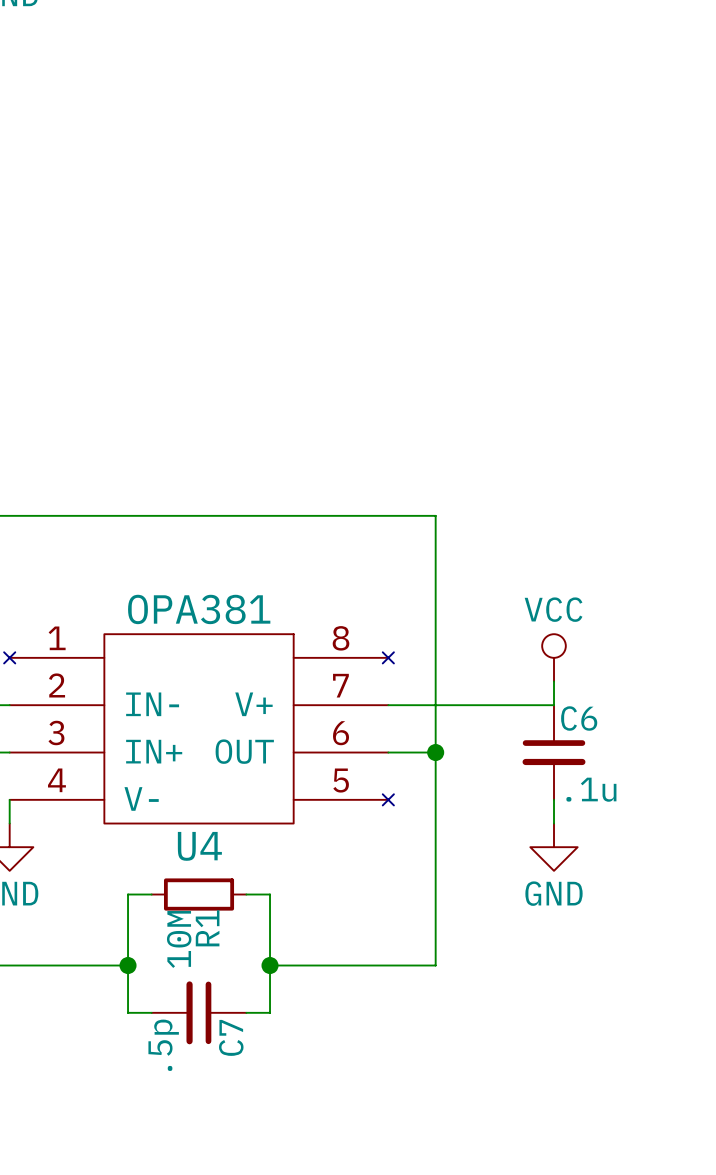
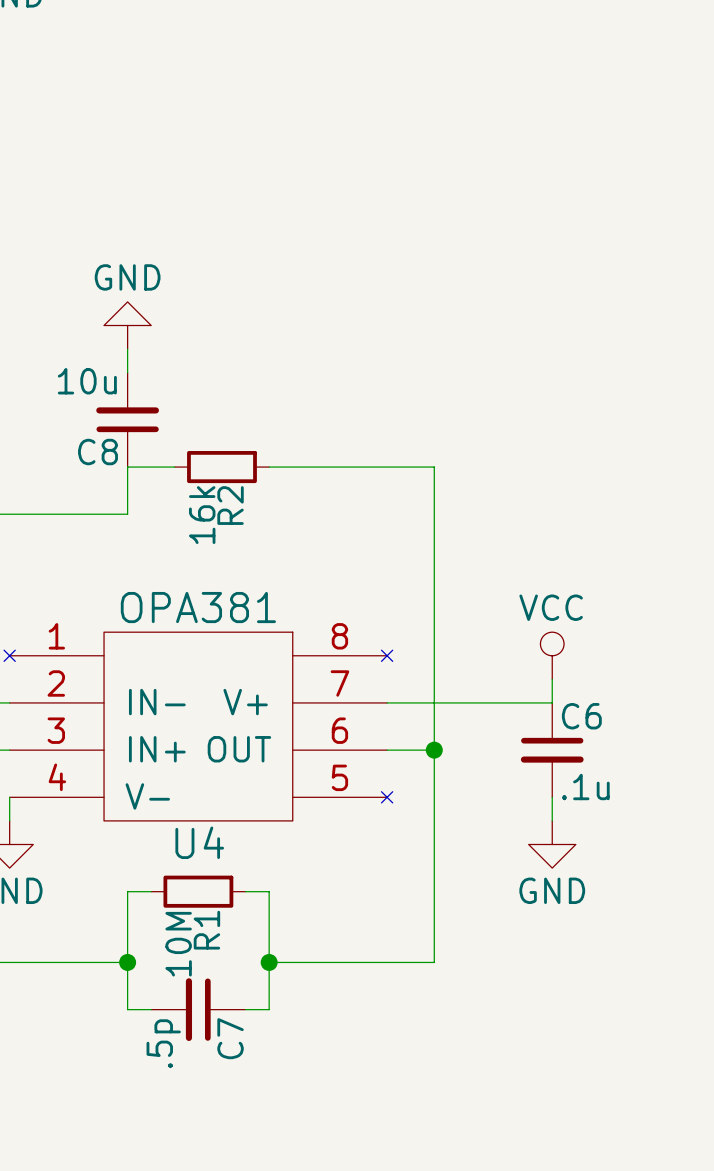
power symbol: none -> GND (127, 325)
wire: none -> (127, 349) (127, 372)
C8: none -> 10u (127, 419)
wire: none -> (174, 467) (127, 467) (127, 514)
R2: none -> 16k (221, 467)
wire: (128, 515) (435, 515) -> (269, 467) (434, 467) (434, 514)

